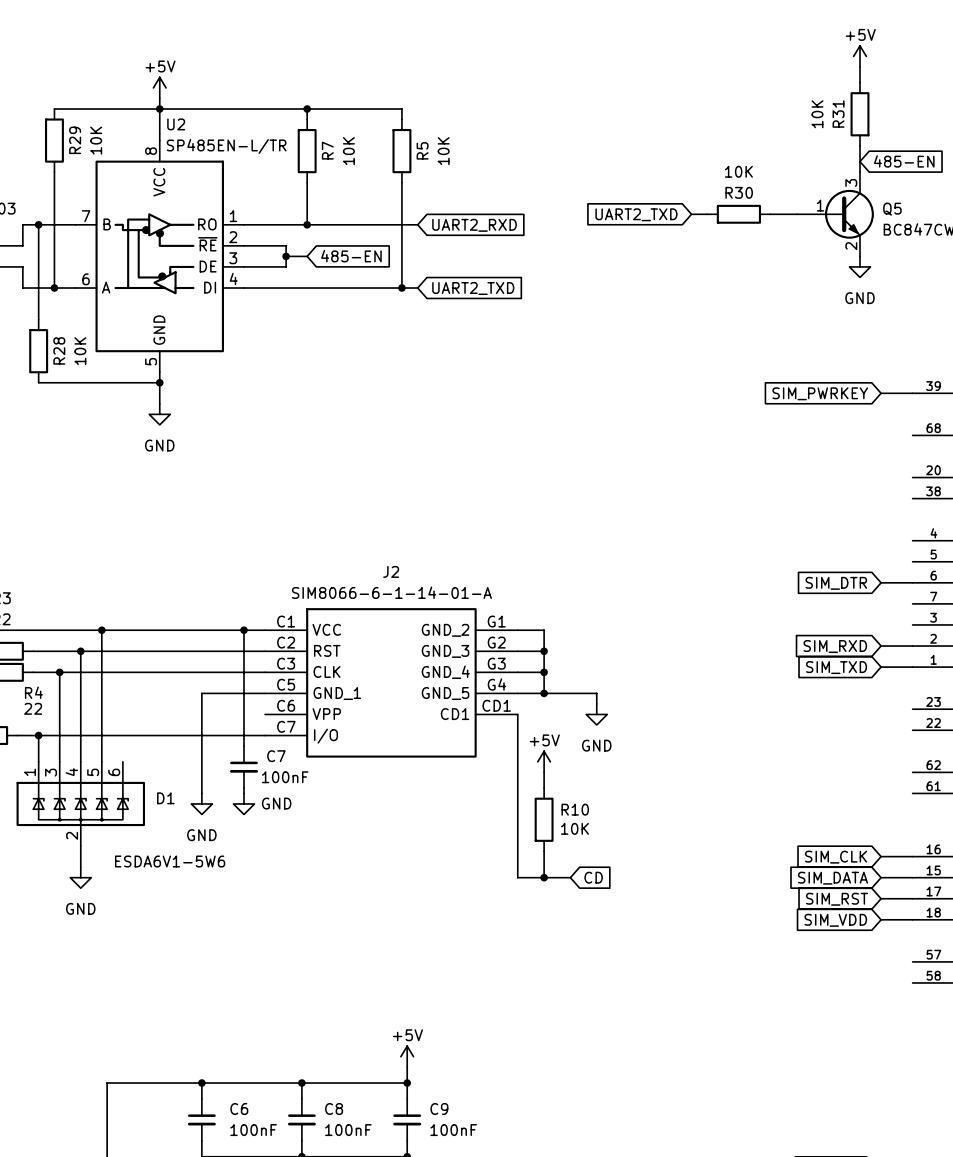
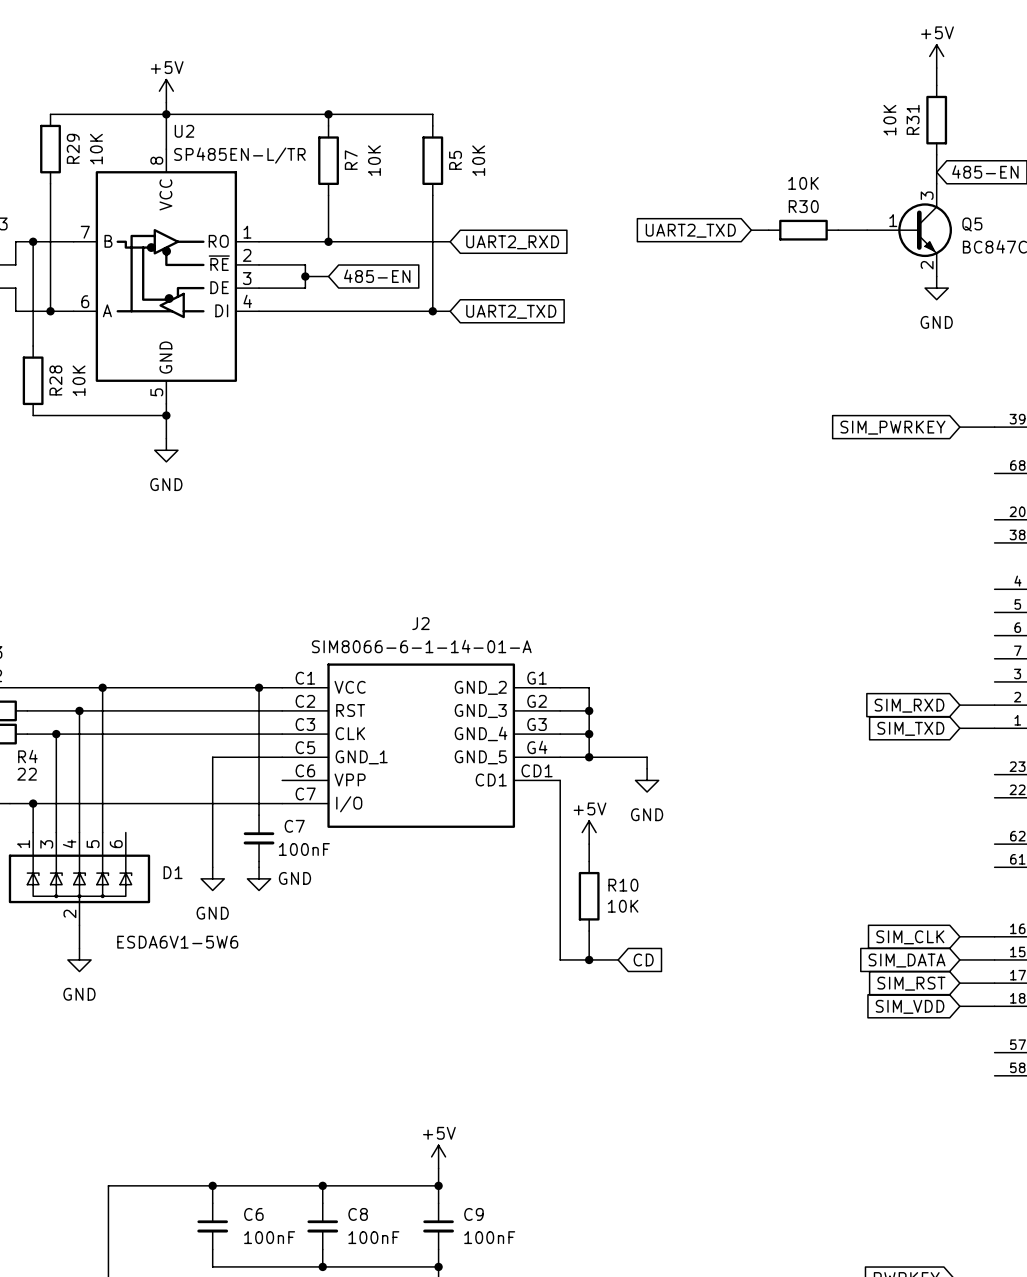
wire: (881, 582) (912, 582) -> none
global label: SIM_DTR (836, 583) -> none

